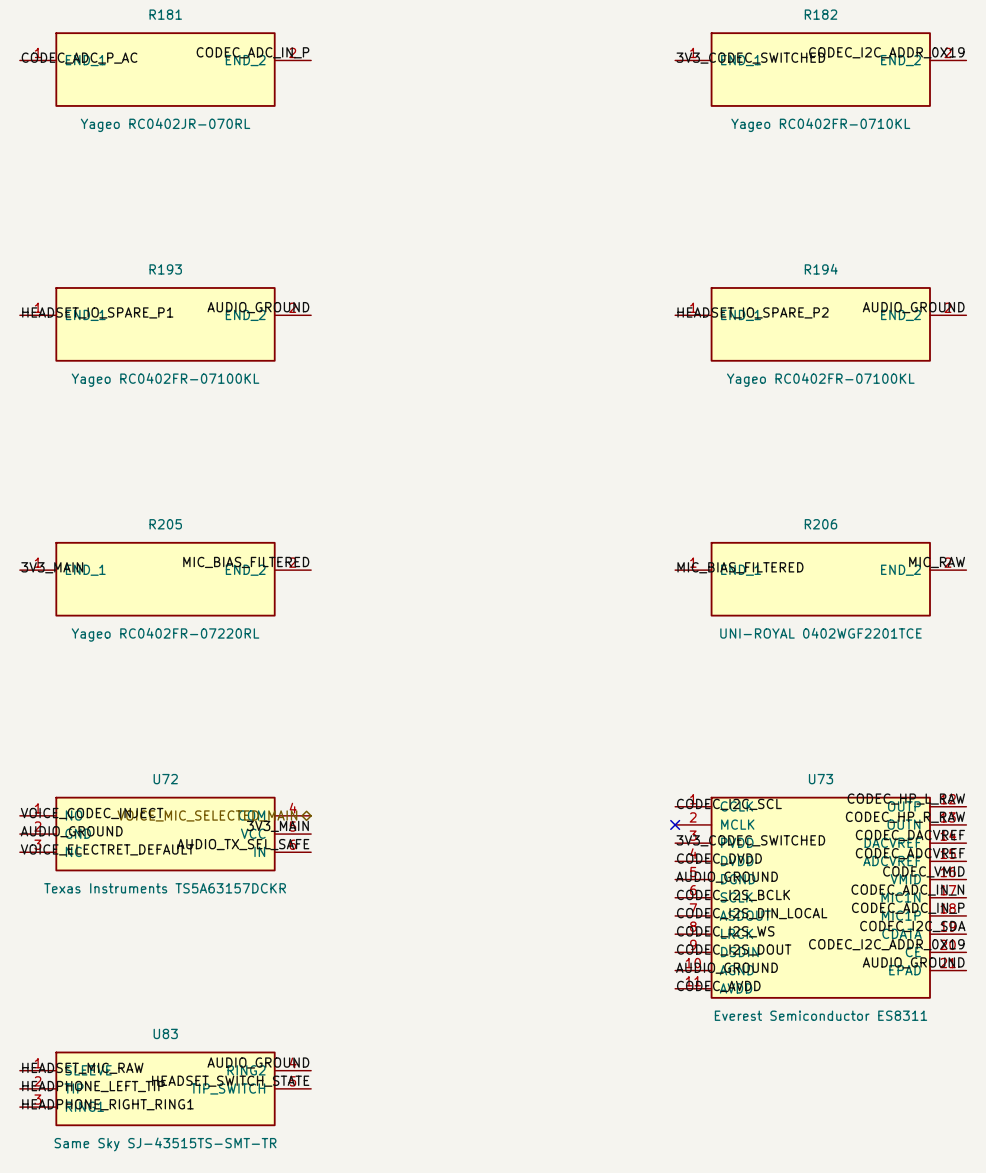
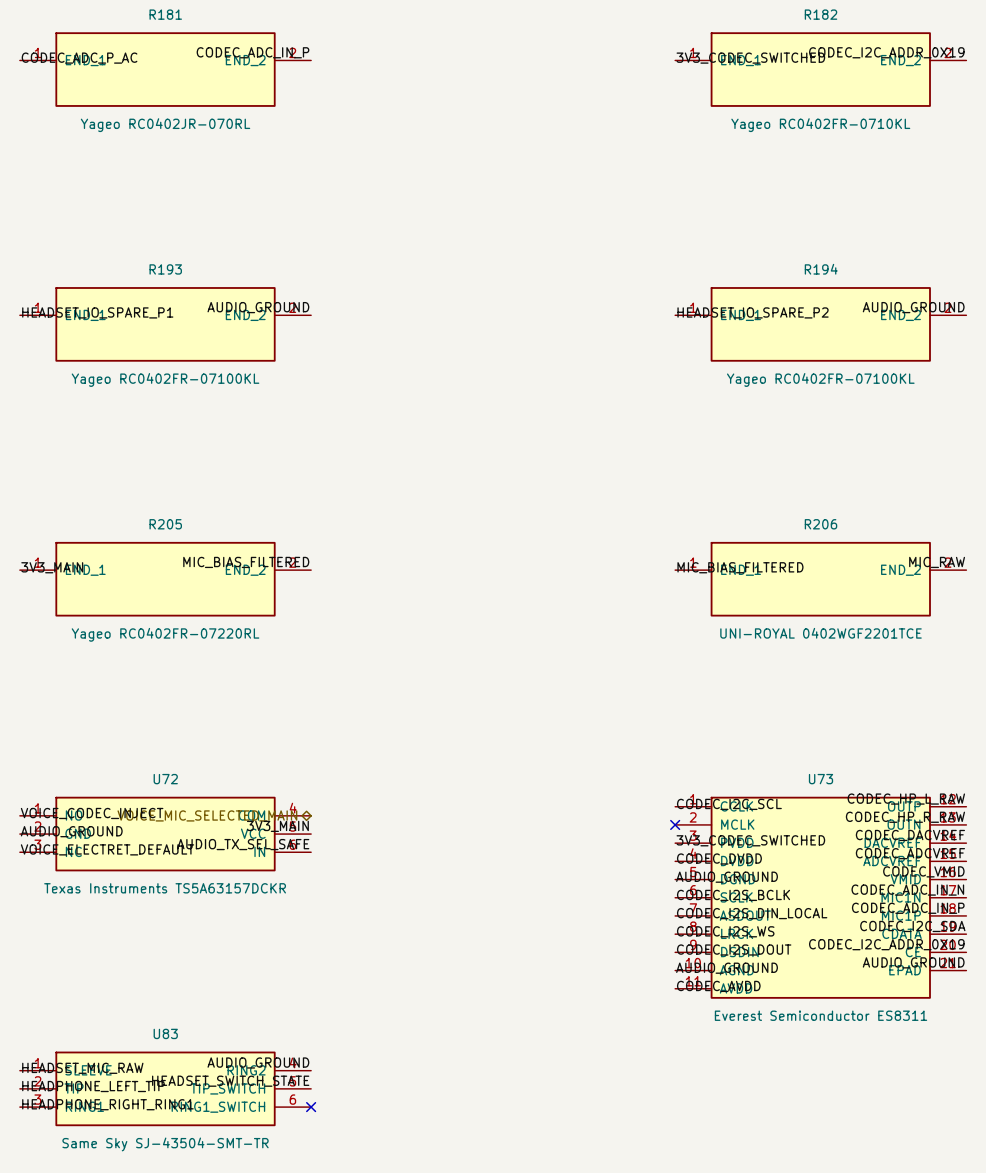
U83 symbol: [19, 1051, 312, 1127] -> [19, 1051, 312, 1127]
no-connect mark: none -> (311, 1107)
U83 value: Same Sky SJ-43515TS-SMT-TR (165, 1144) -> Same Sky SJ-43504-SMT-TR (165, 1144)

